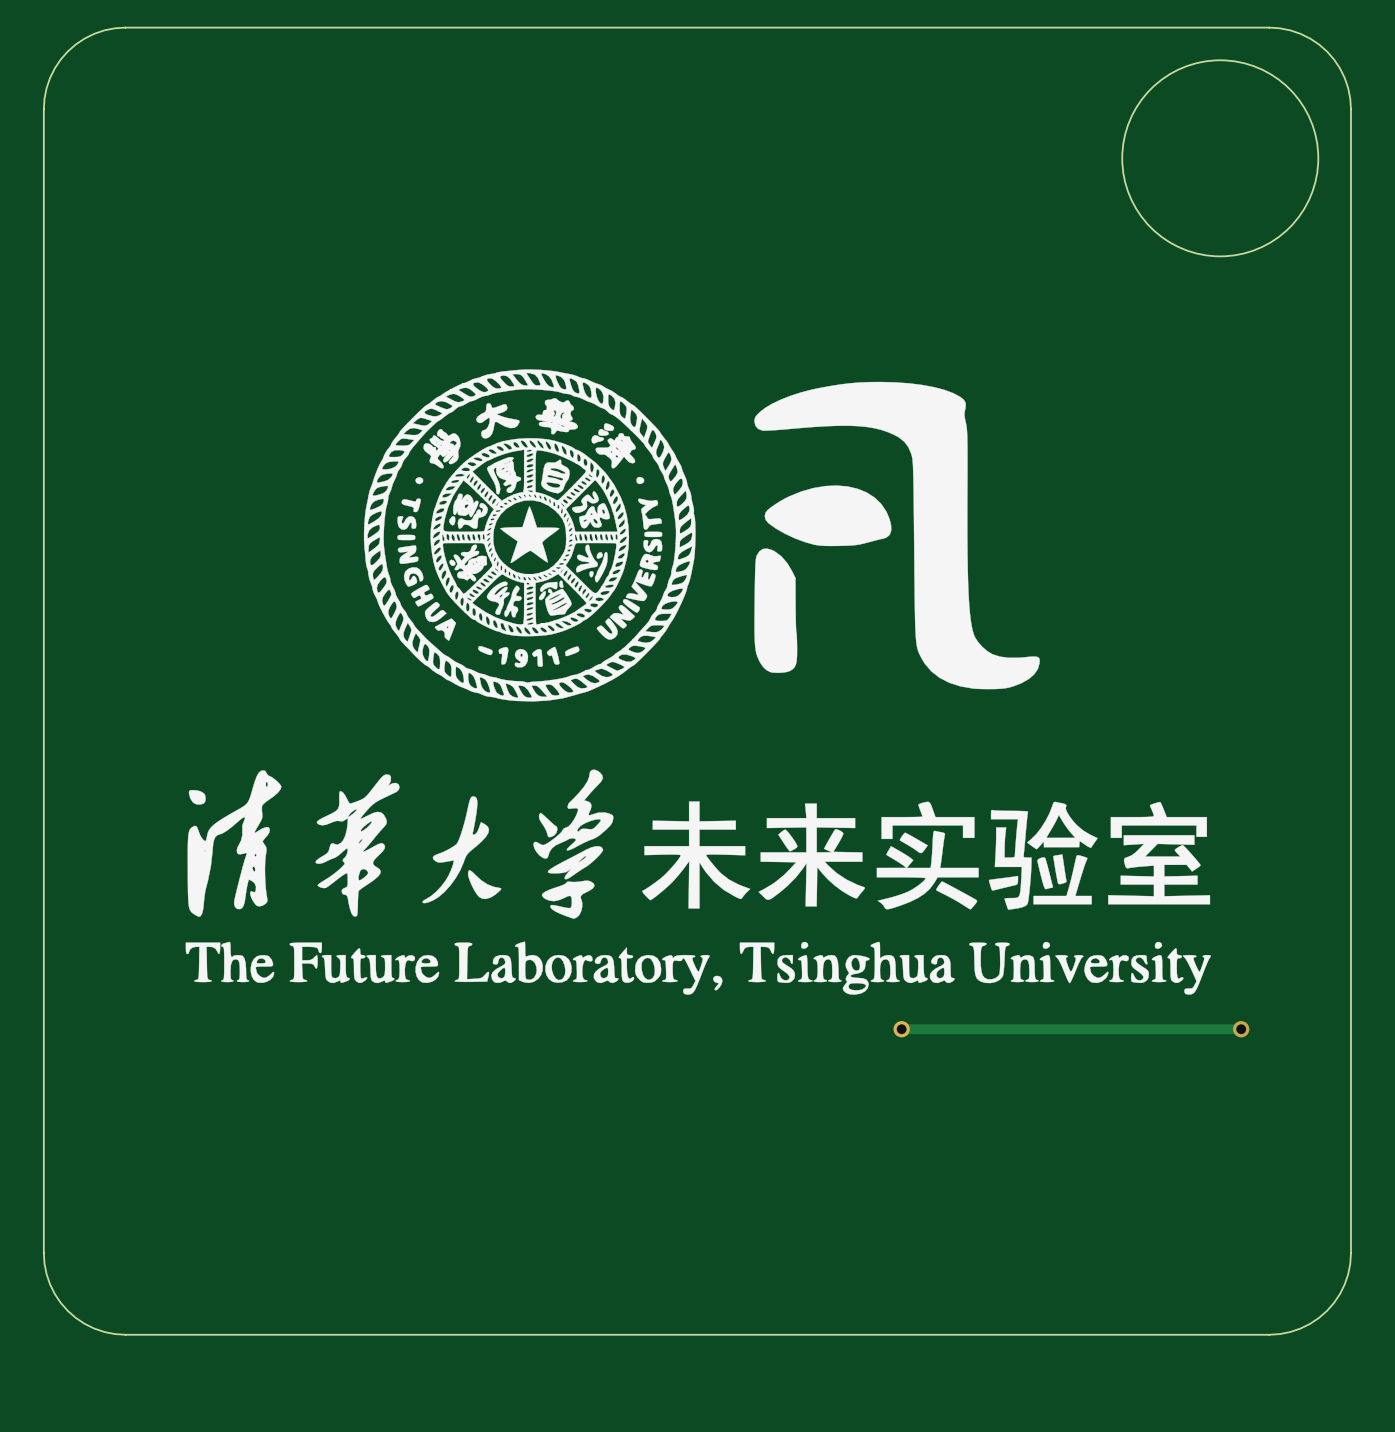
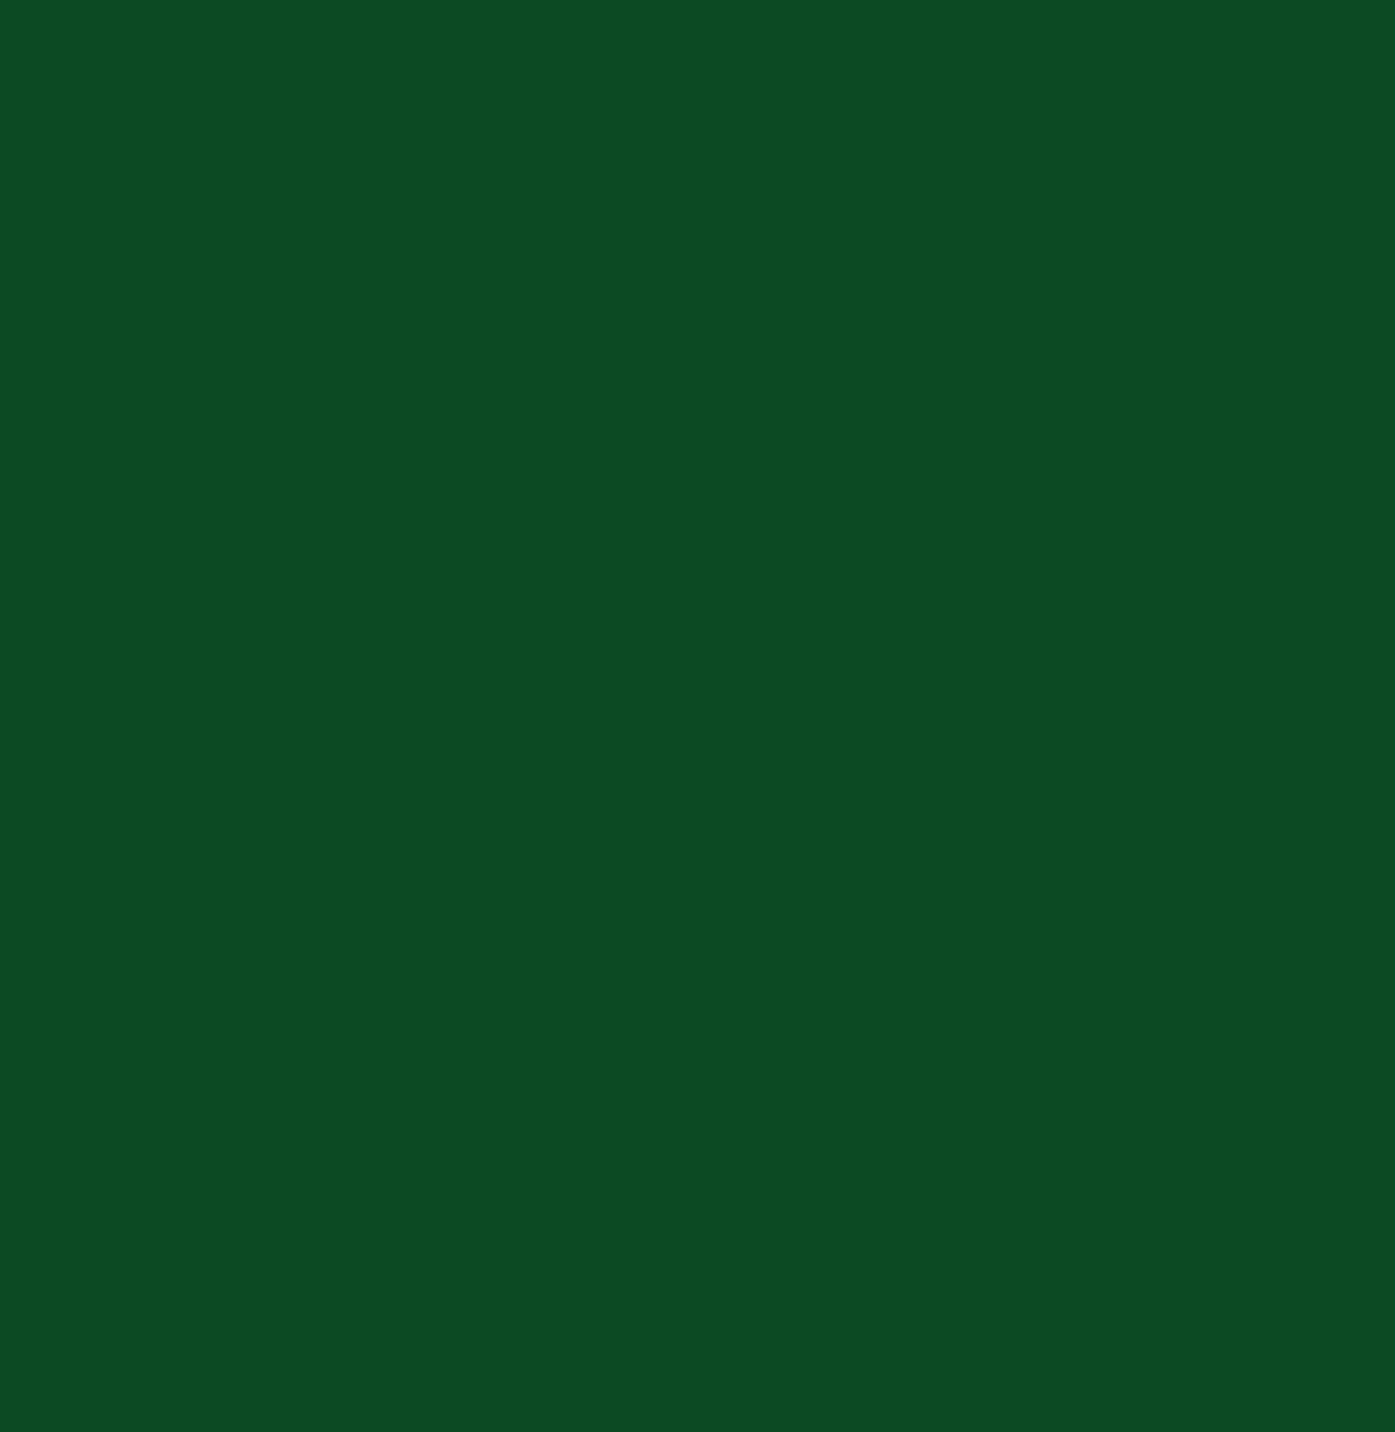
board edge: (1269, 27) (125, 27) (94, 33) (67, 51) (50, 78) (43, 109) (43, 1253) (50, 1284) (67, 1310) (94, 1328) (125, 1334) (1269, 1334) (1300, 1328) (1327, 1310) (1344, 1284) (1350, 1253) (1350, 109) (1344, 78) (1327, 51) (1300, 33) (1269, 27) -> none
round board edge: [1121, 59, 1320, 258] -> none
drawing: [185, 369, 1212, 995] -> none
part: (901, 1029) -> none
track: (1241, 1029) (901, 1029) -> none
via: (1241, 1029) -> none

